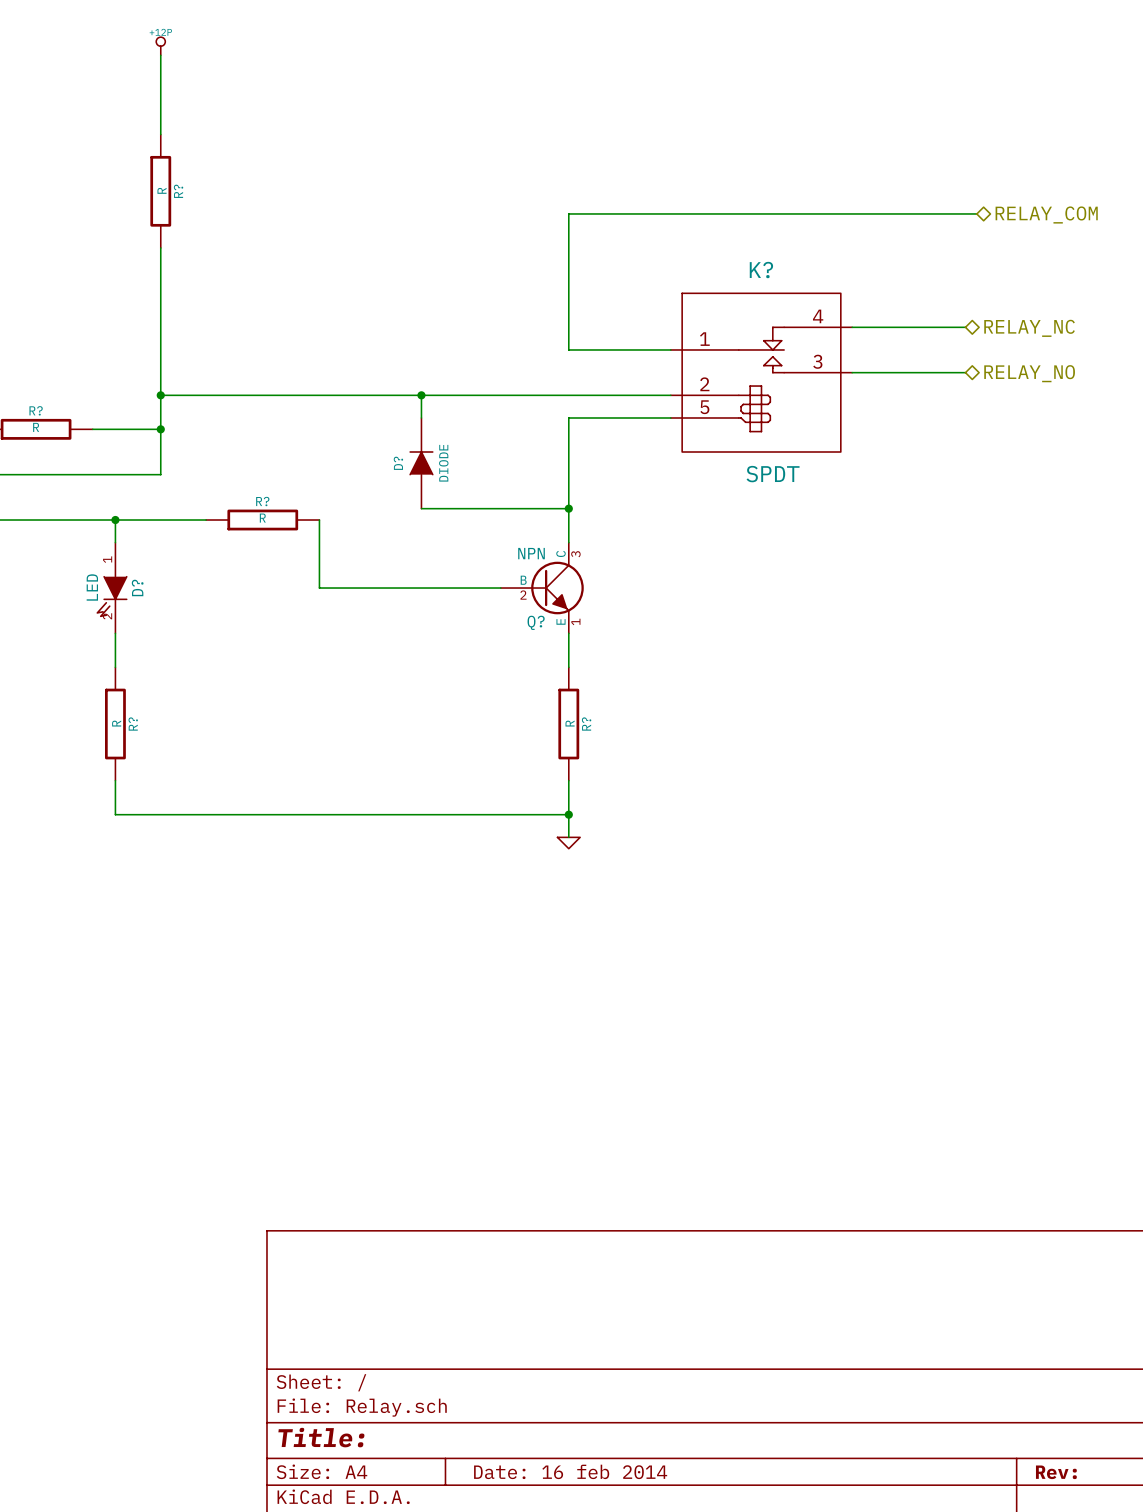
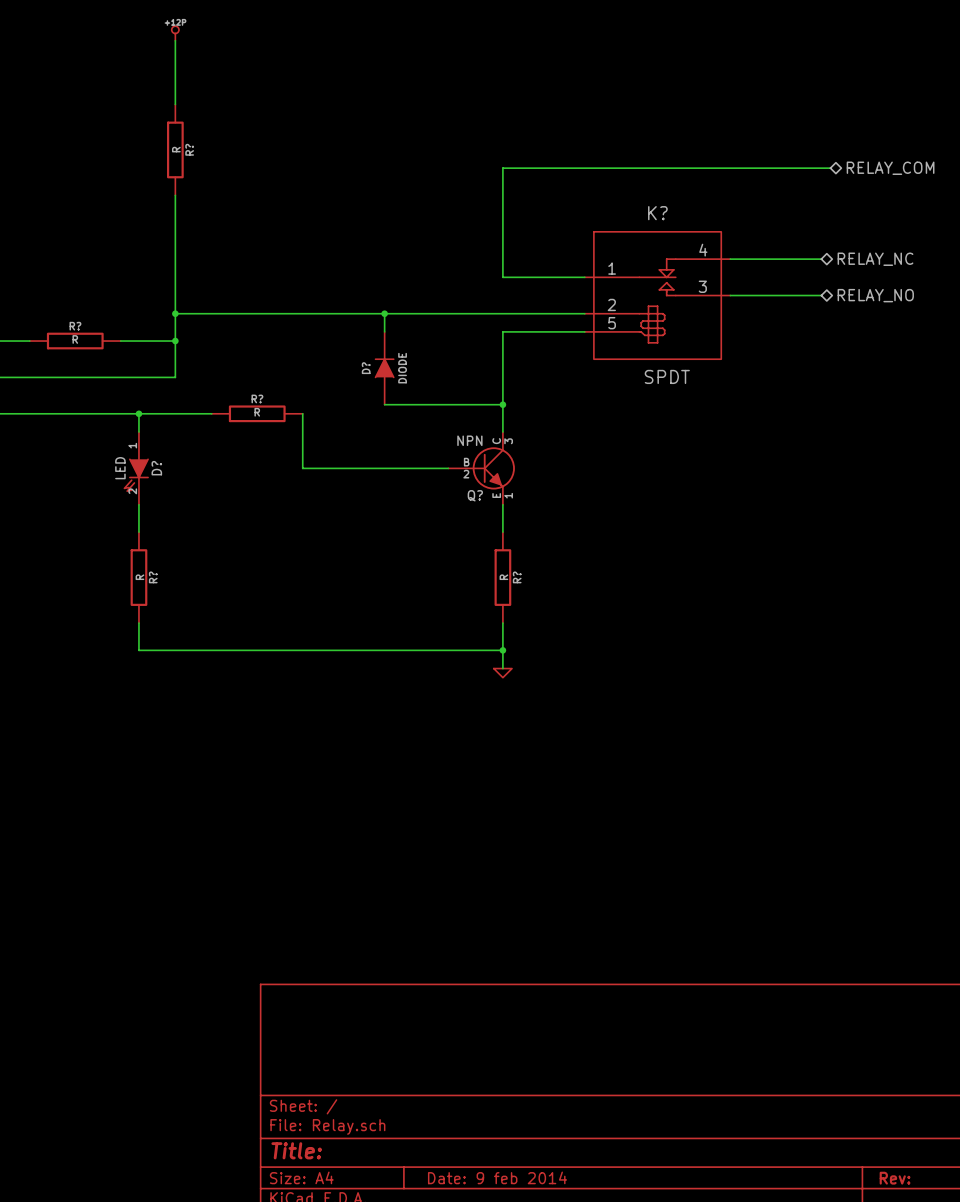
title block: Date: 16 feb 2014 (570, 1471) -> Date: 9 feb 2014 (497, 1177)

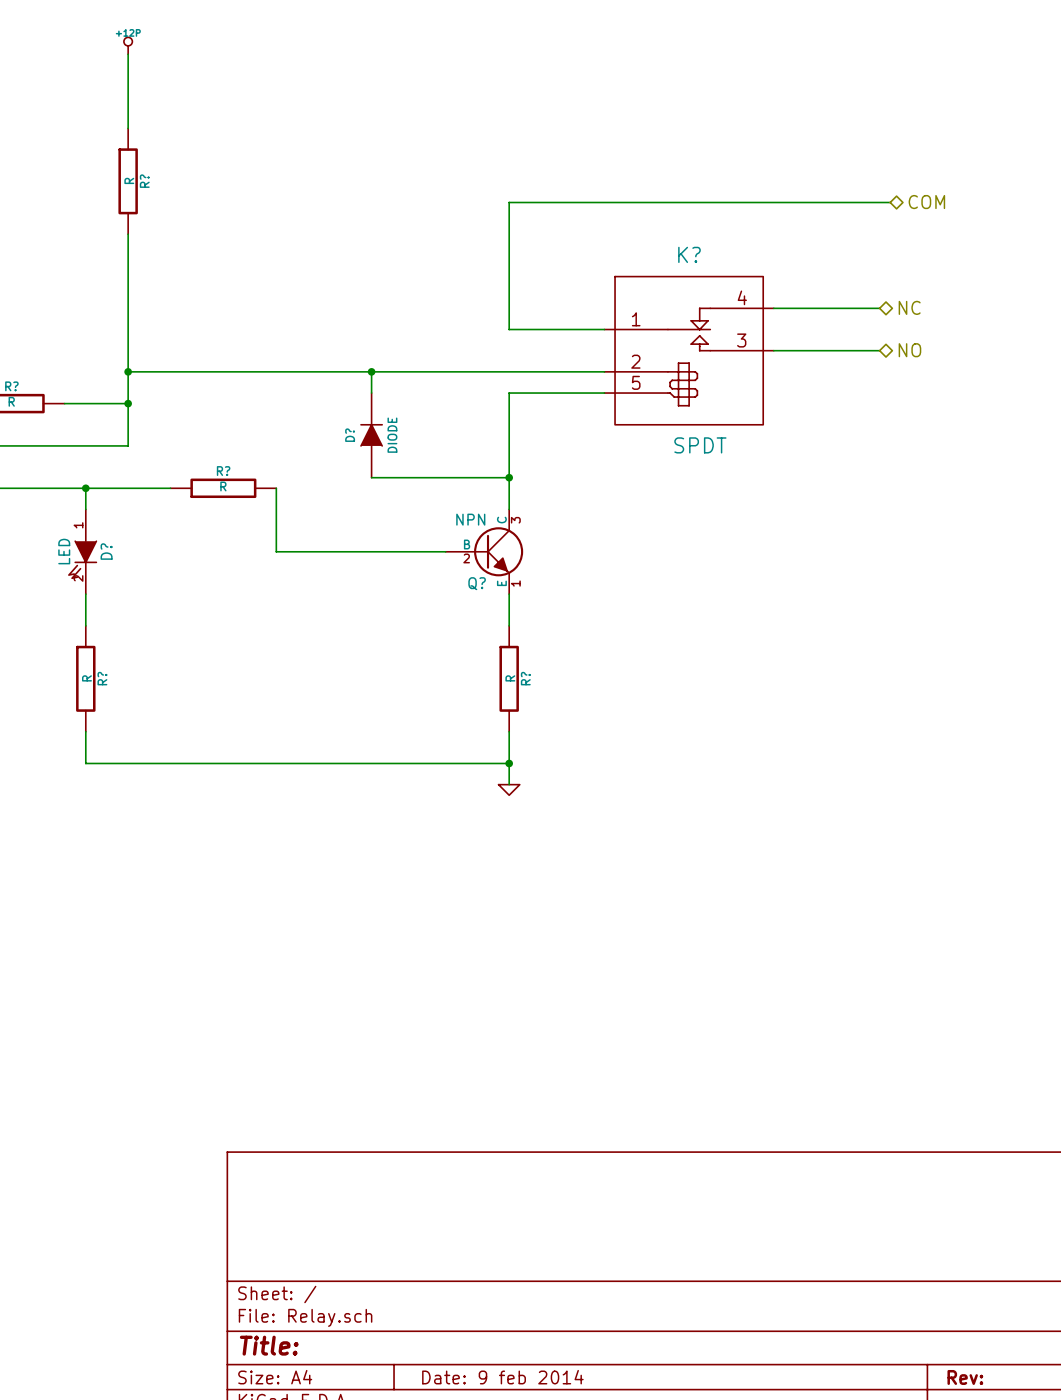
hierarchical label: RELAY_COM (890, 168) -> COM (926, 202)
hierarchical label: RELAY_NC (875, 259) -> NC (909, 307)
hierarchical label: RELAY_NO (875, 295) -> NO (909, 350)

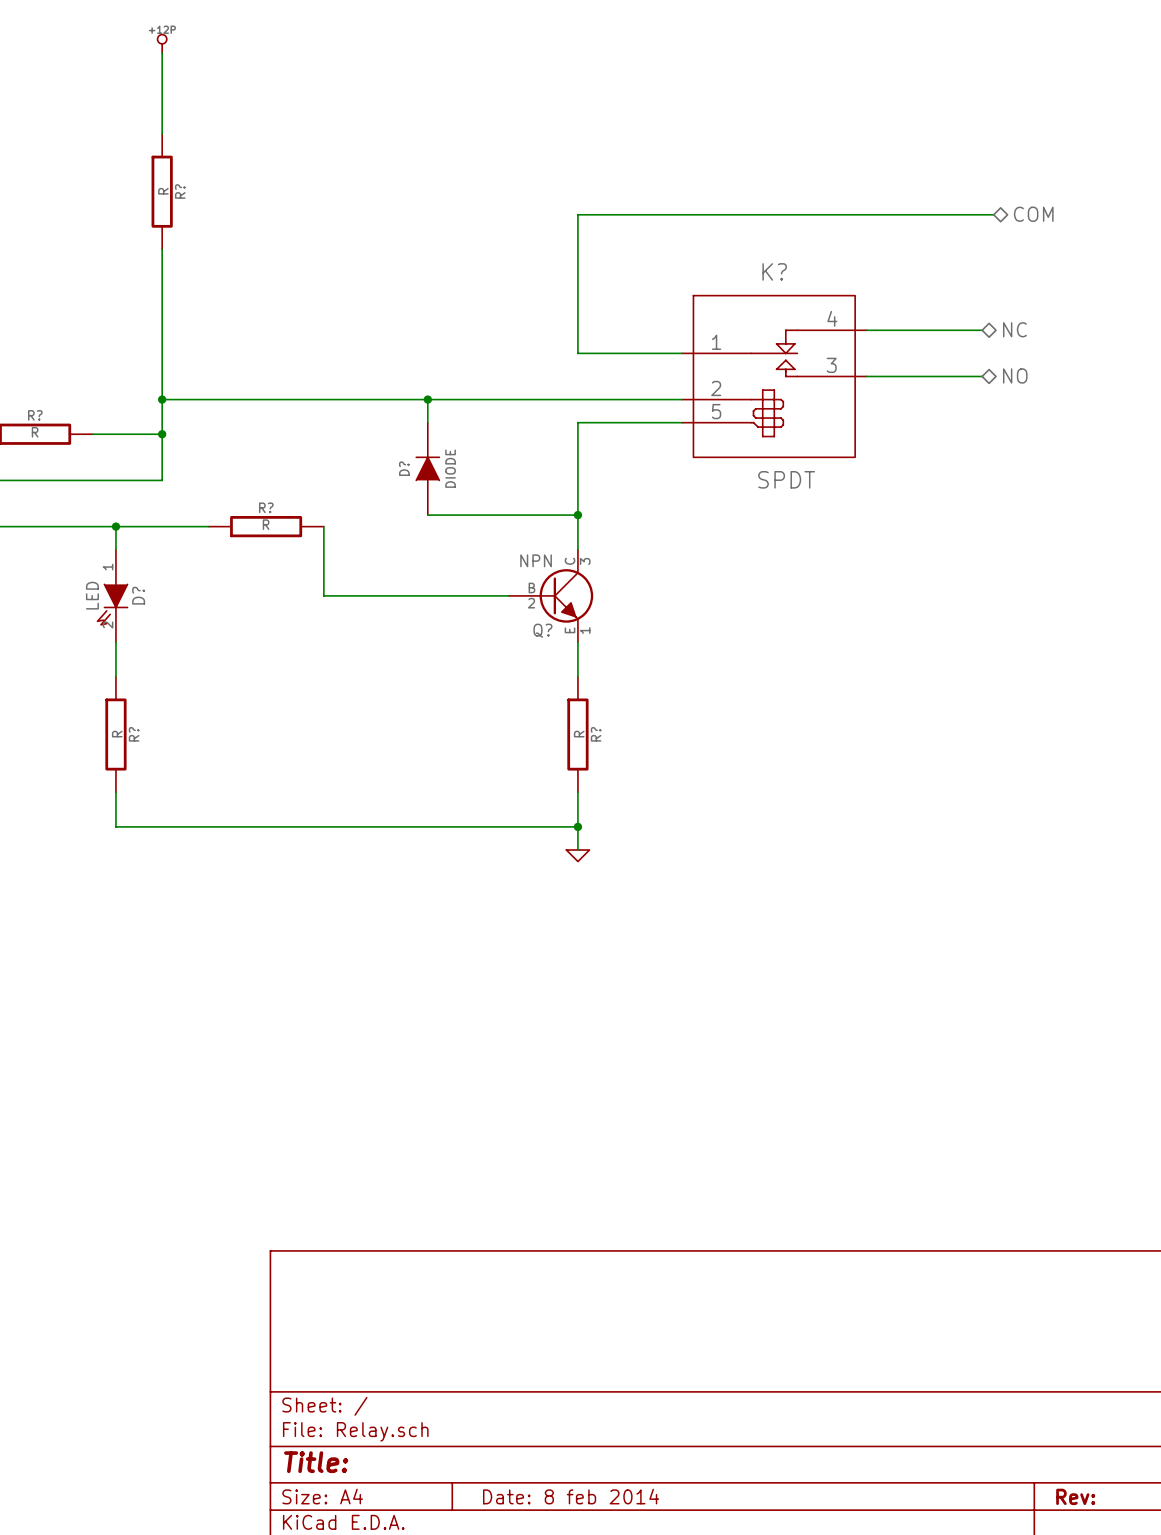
title block: Date: 9 feb 2014 (502, 1377) -> Date: 8 feb 2014 (571, 1496)

